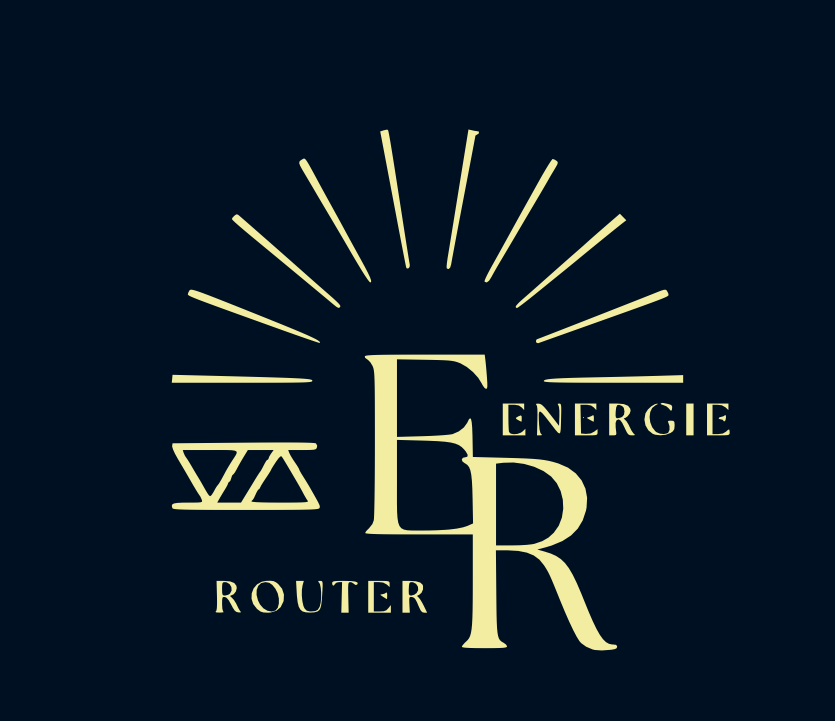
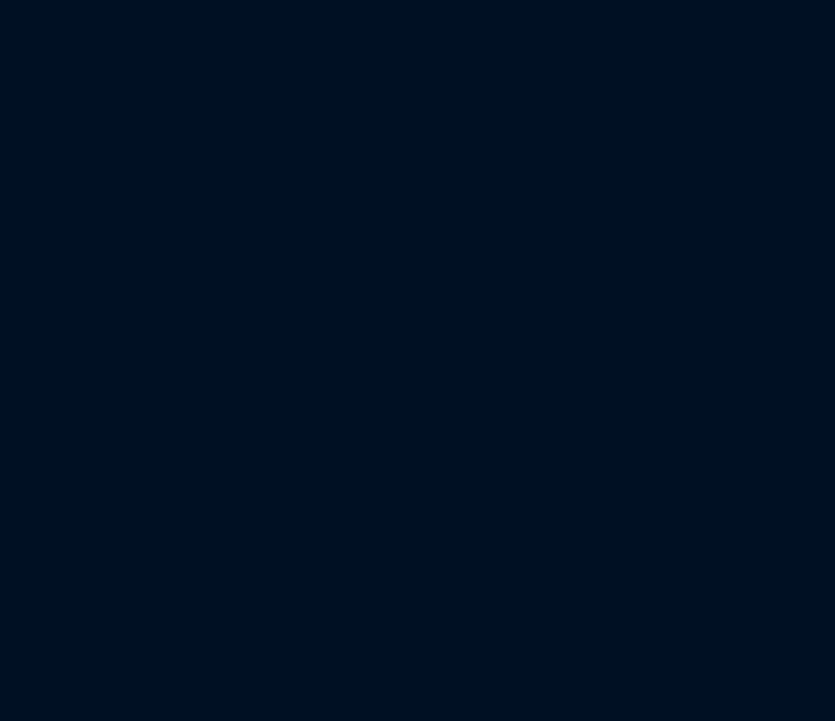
drawing: [171, 129, 730, 651] -> none

